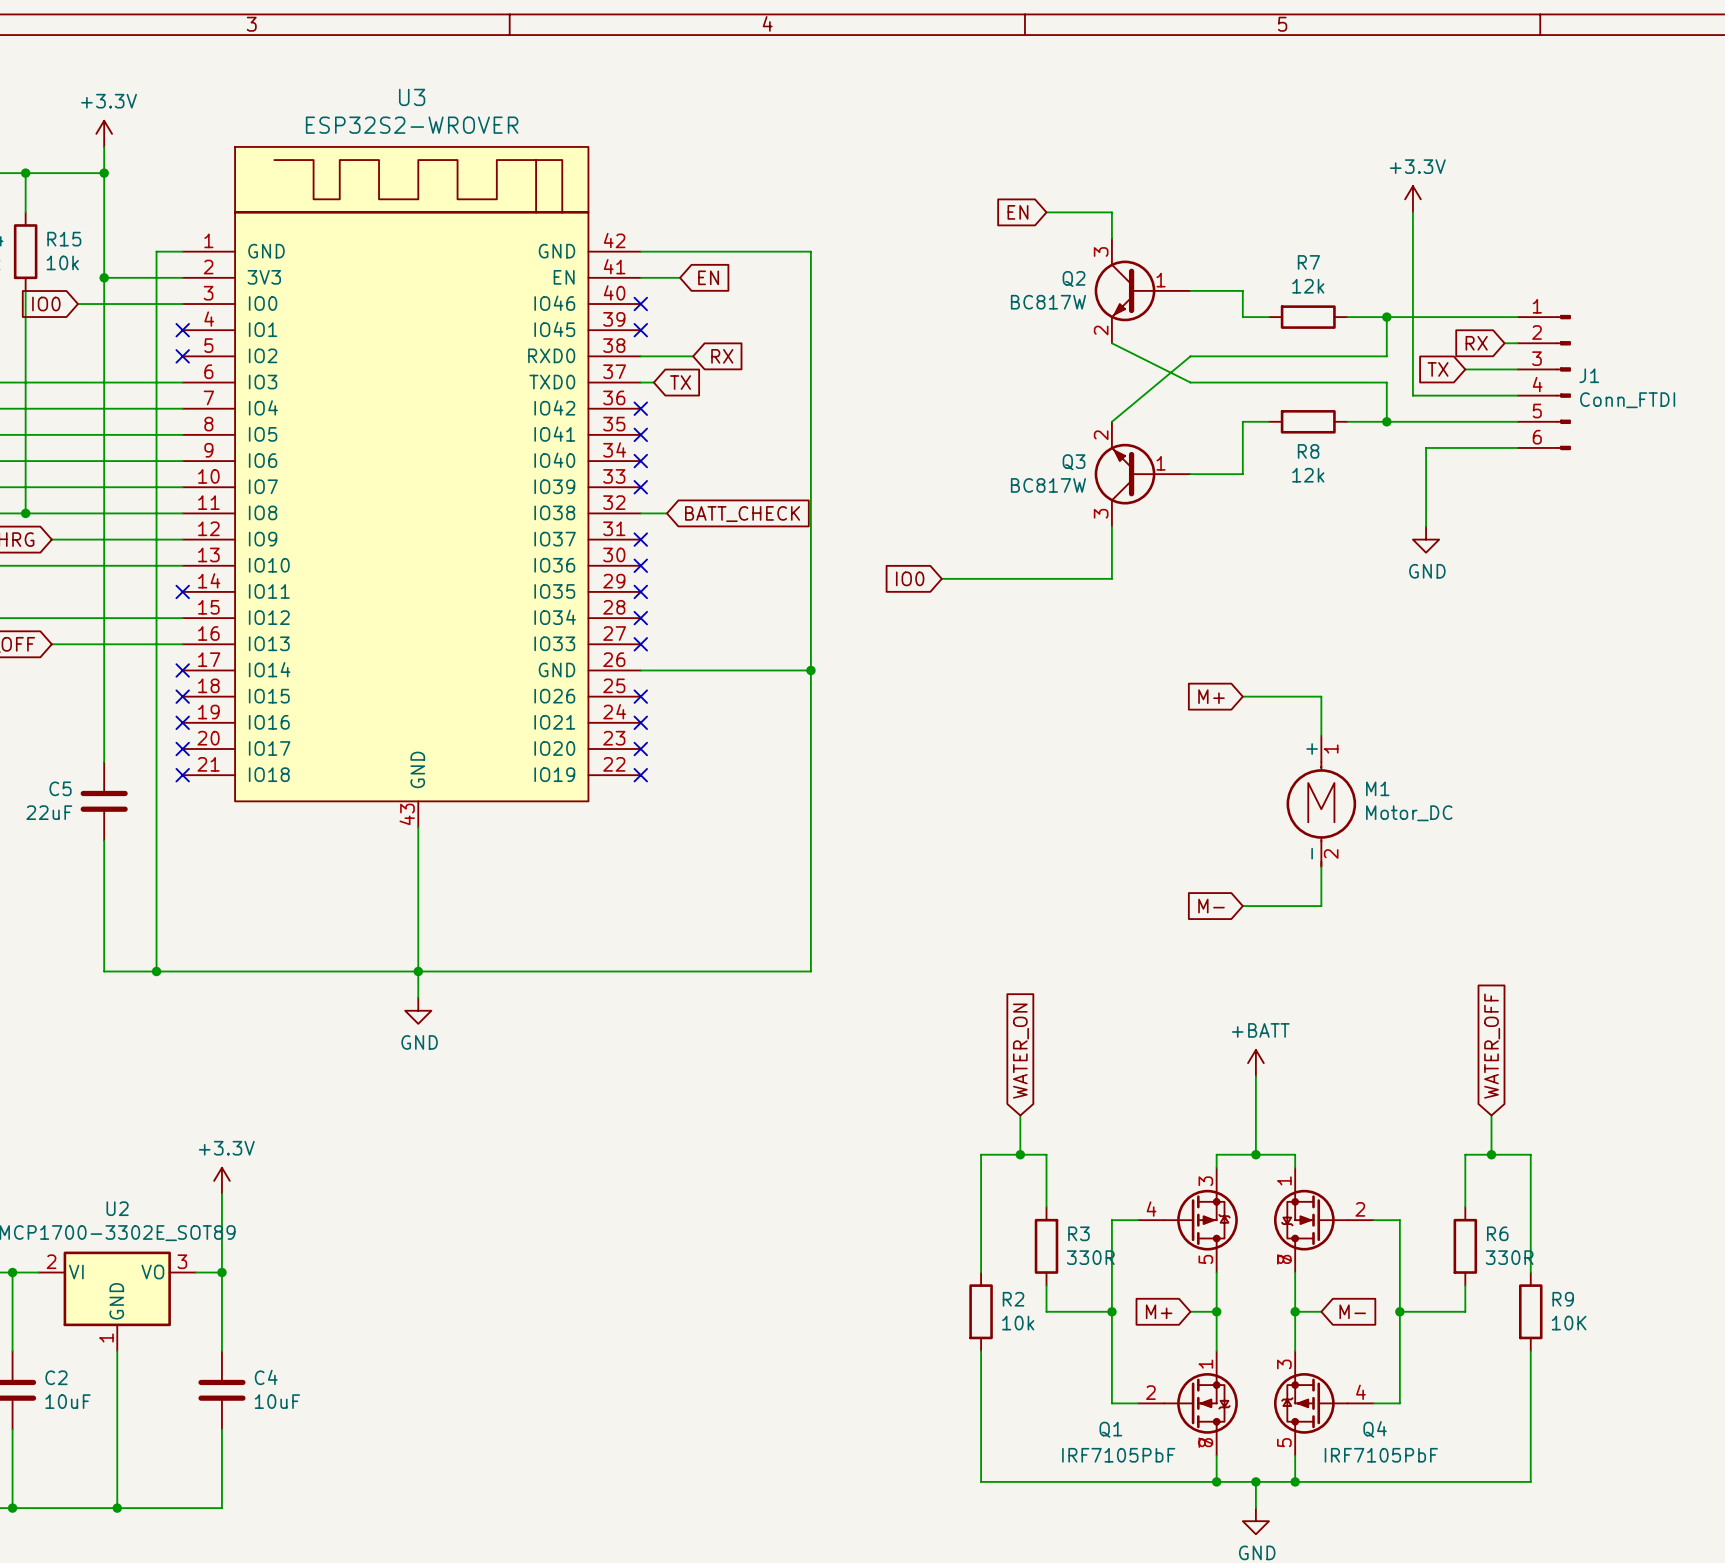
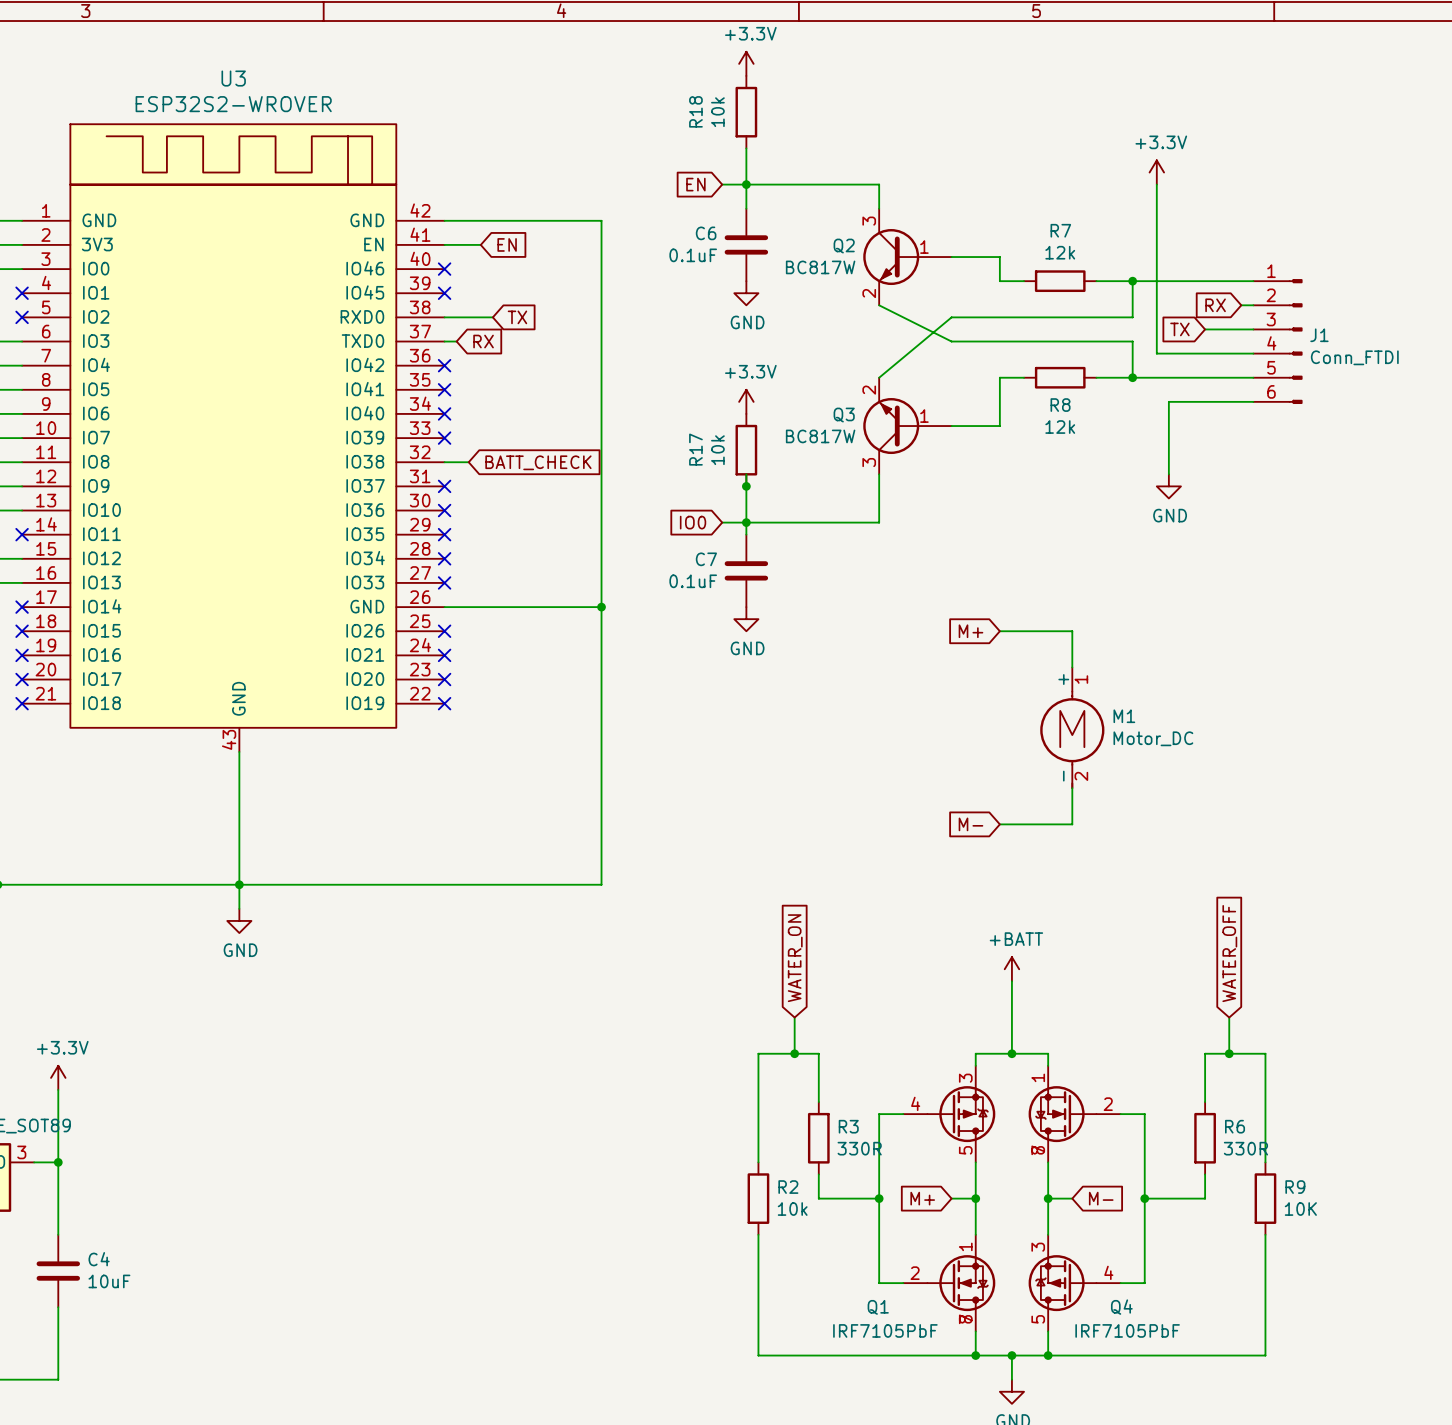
power symbol: none -> +3.3V (746, 63)
R18: none -> 10k (746, 112)
wire: none -> (746, 148) (746, 208)
wire: none -> (722, 184) (818, 184)
junction: none -> (746, 184)
global label position: EN (1017, 212) -> EN (695, 184)
C6: none -> 0.1uF (746, 244)
power symbol: none -> GND (746, 293)
global label: RX (722, 356) -> TX (517, 317)
global label: TX (680, 382) -> RX (483, 341)
power symbol: none -> +3.3V (746, 401)
R17: none -> 10k (746, 450)
wire: none -> (746, 474) (746, 534)
junction: none -> (746, 486)
junction: none -> (746, 522)
C7: none -> 0.1uF (746, 570)
power symbol: none -> GND (746, 619)

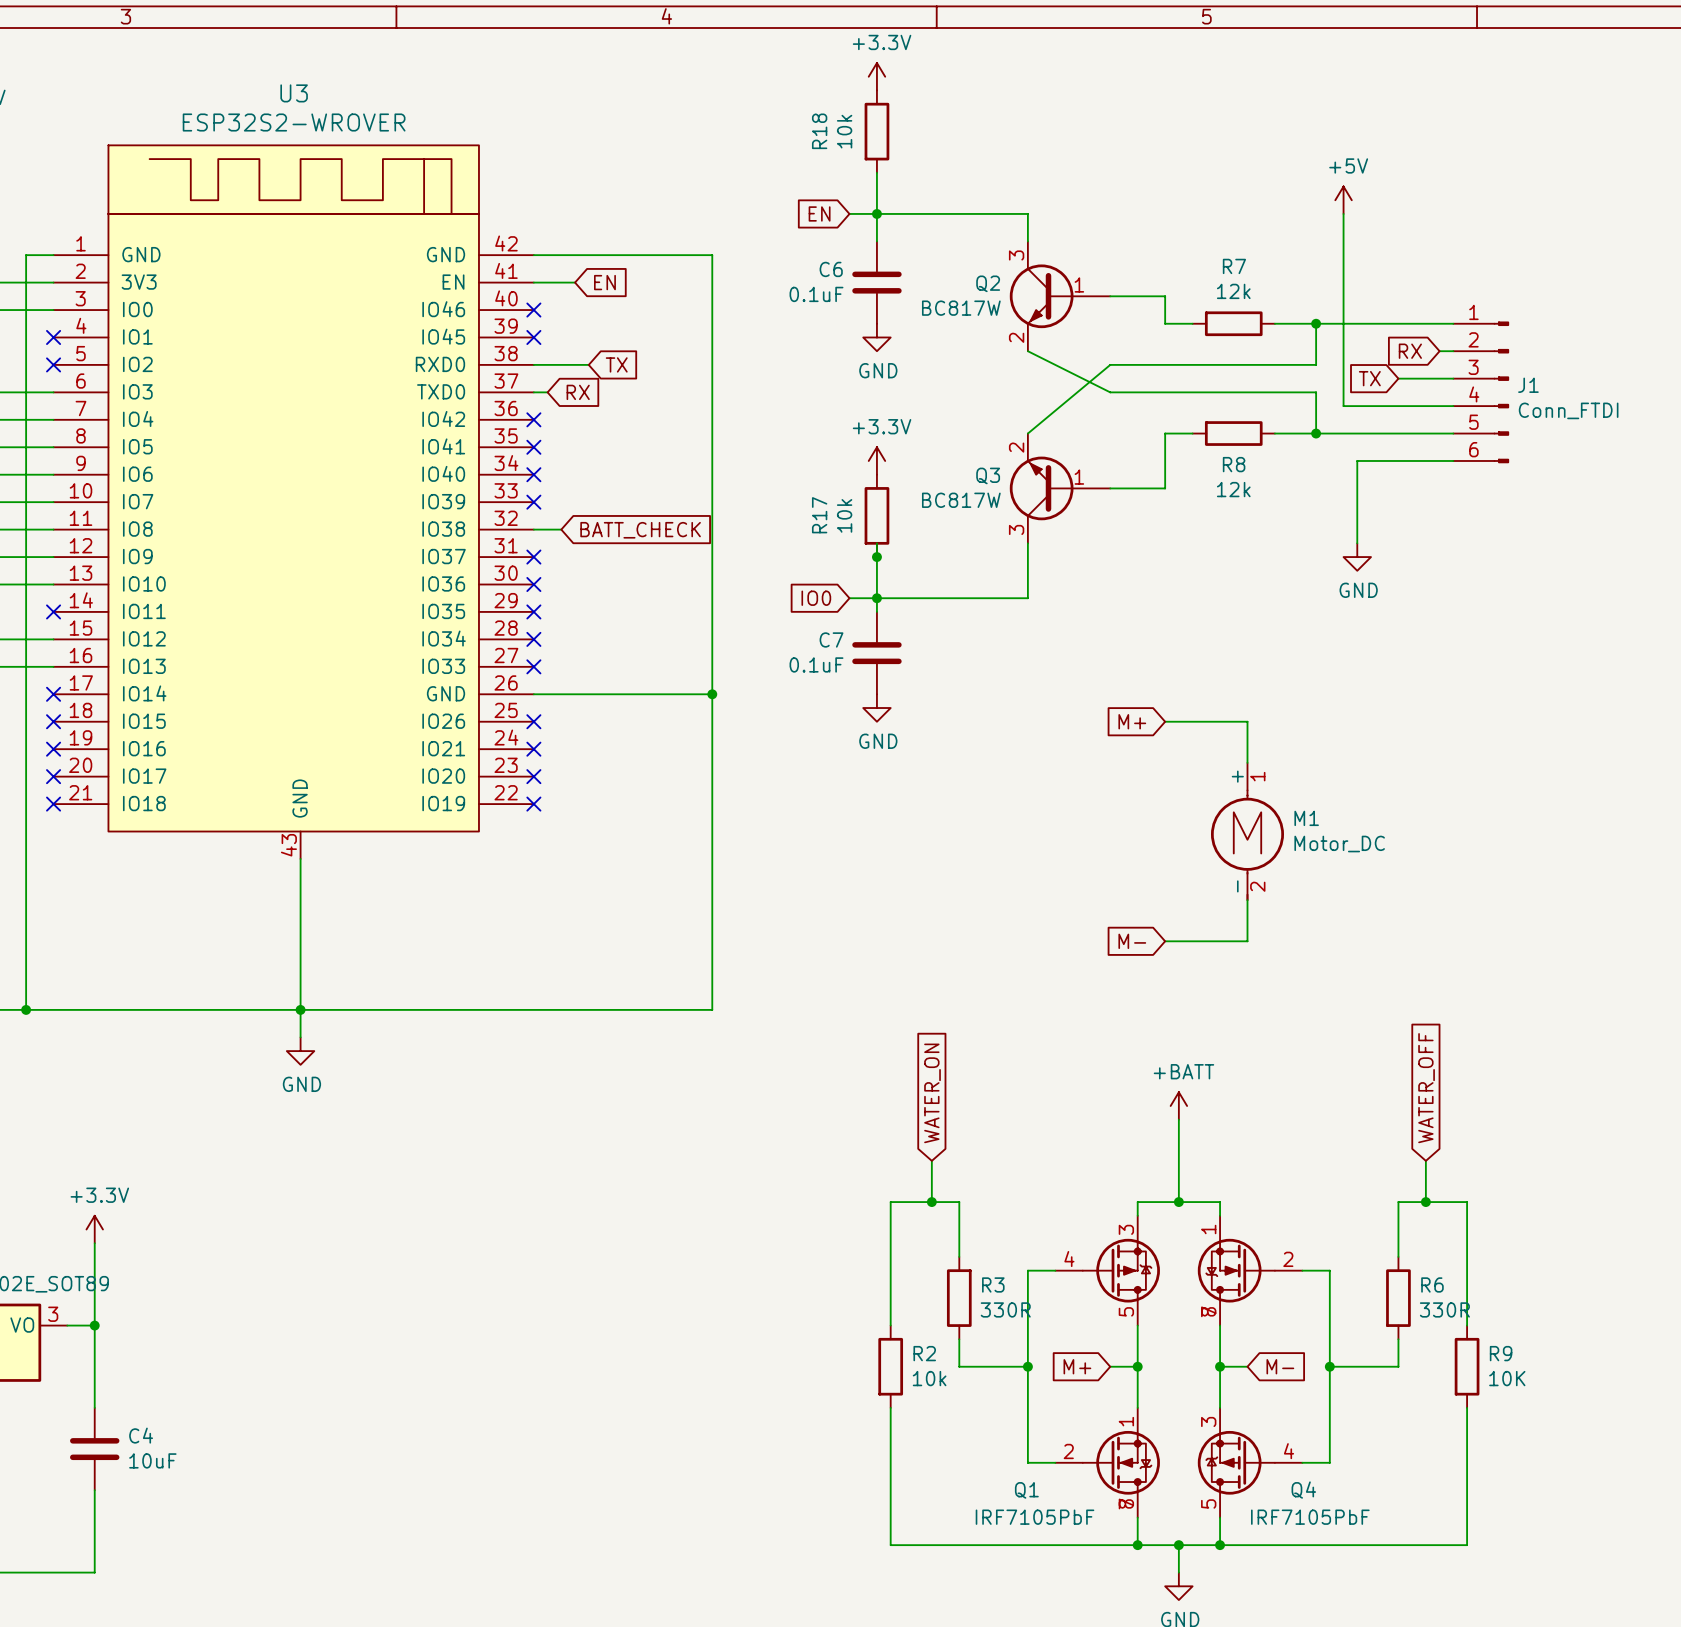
power symbol: +3.3V (1156, 172) -> +5V (1343, 200)

